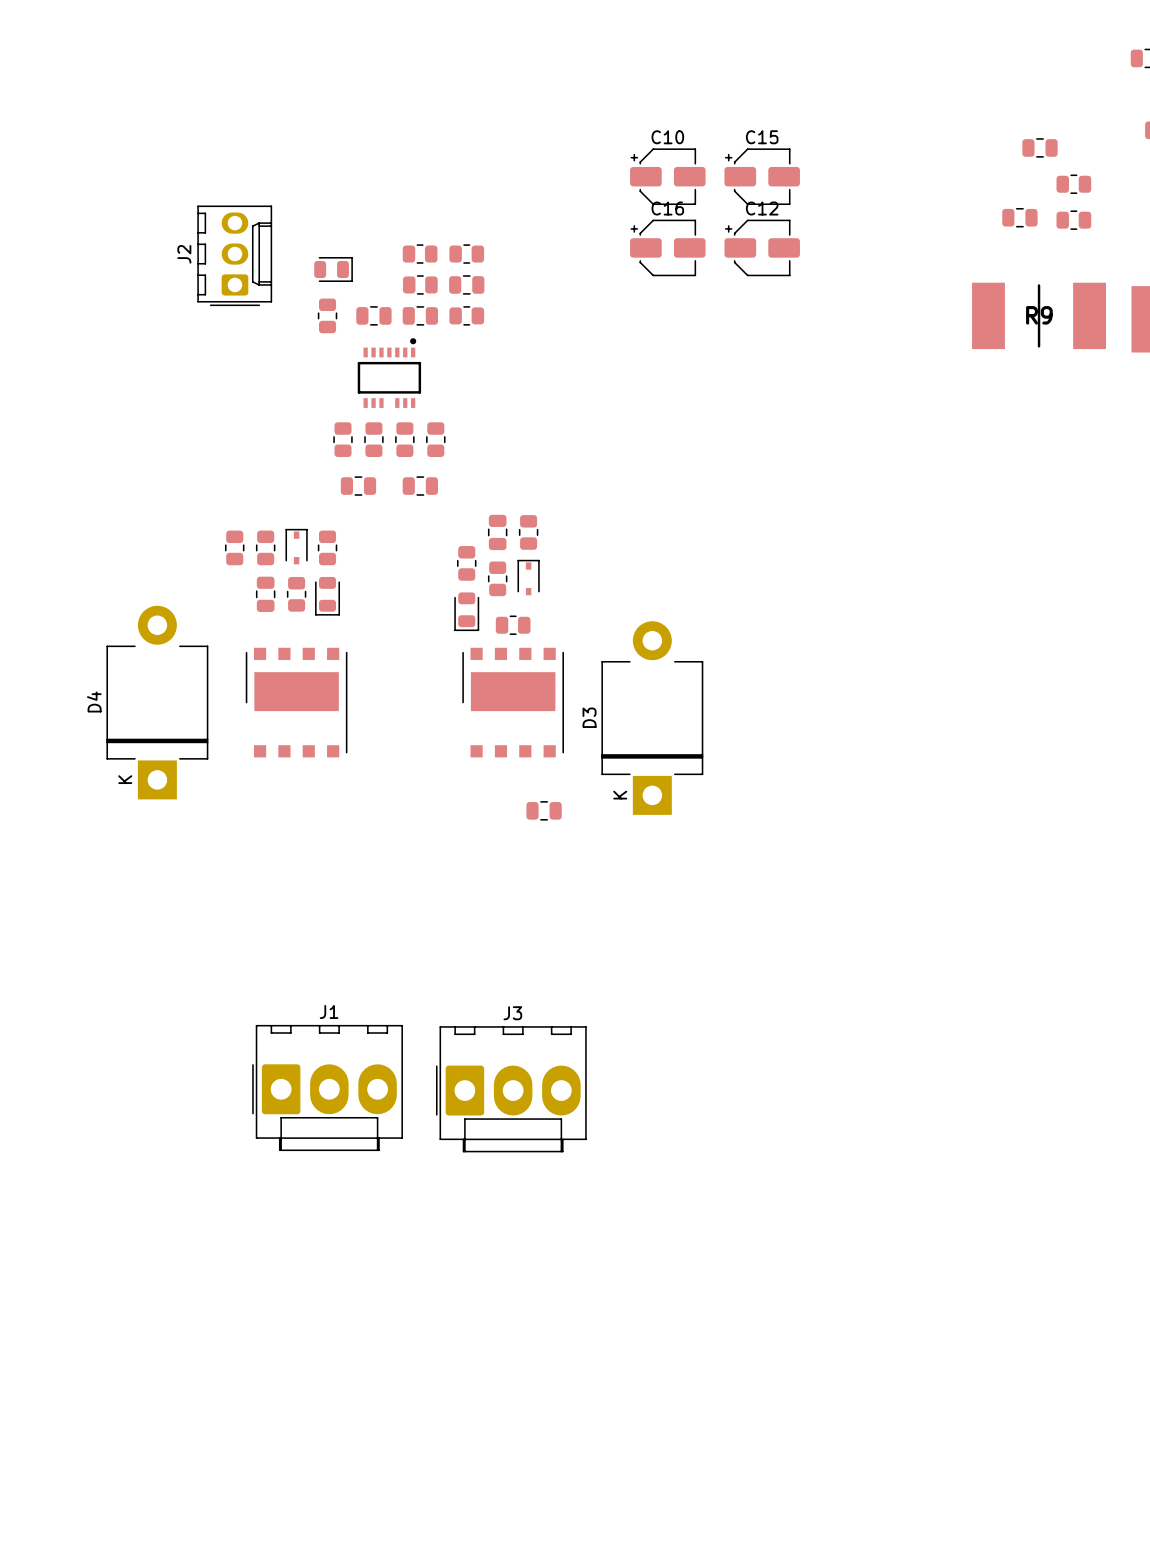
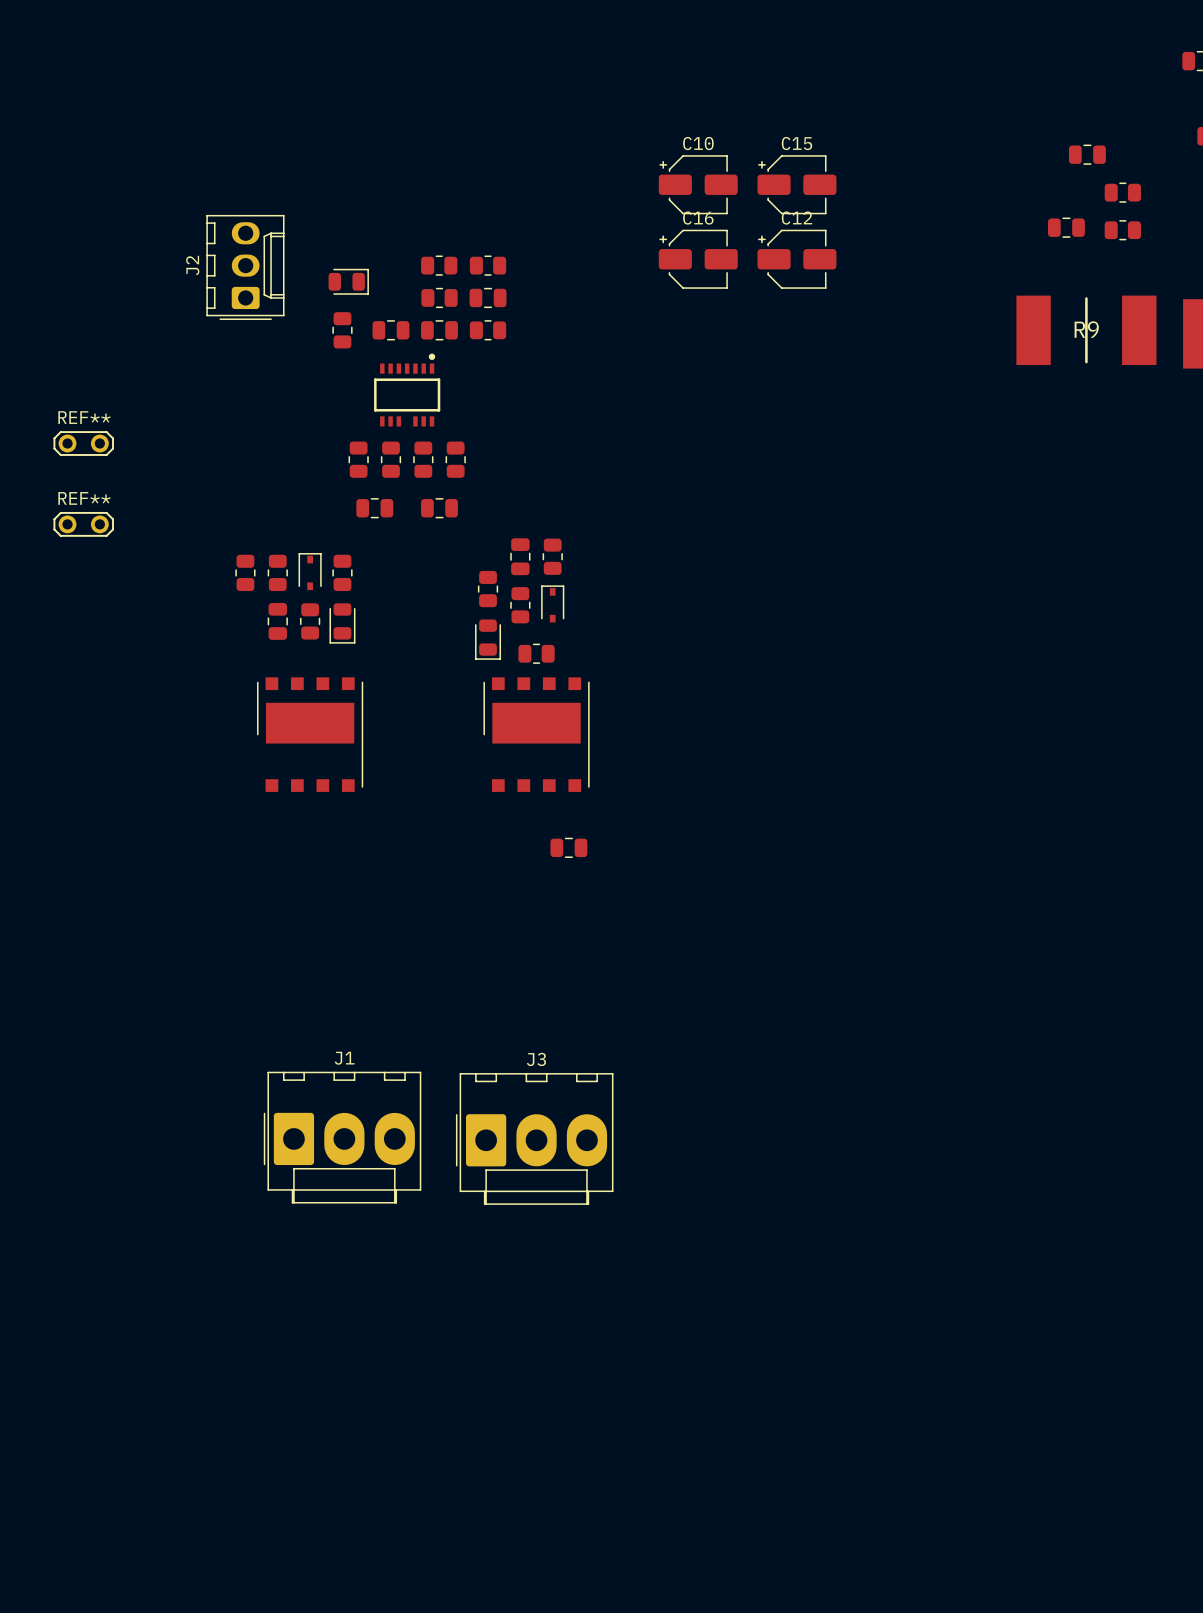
REF**: none -> (83, 443)
REF**: none -> (83, 524)
D4: (157, 702) -> none
D3: (652, 718) -> none

